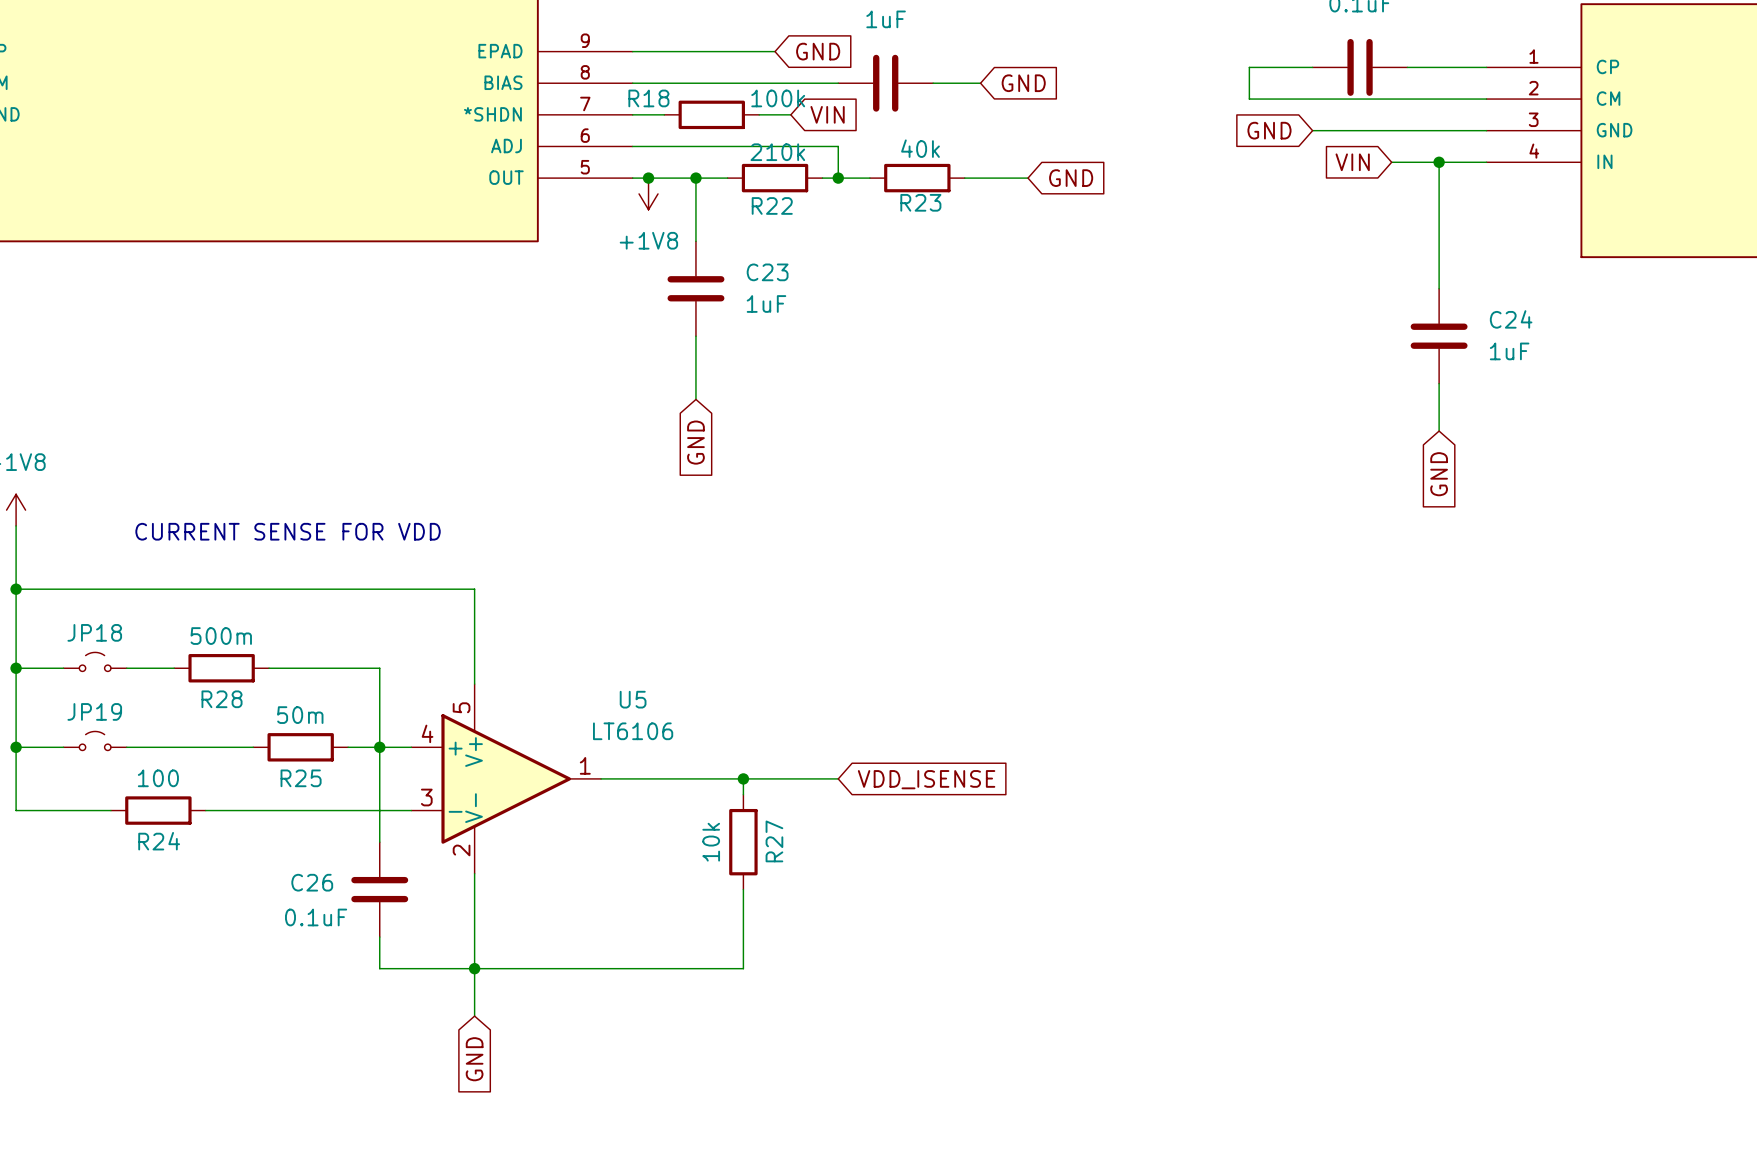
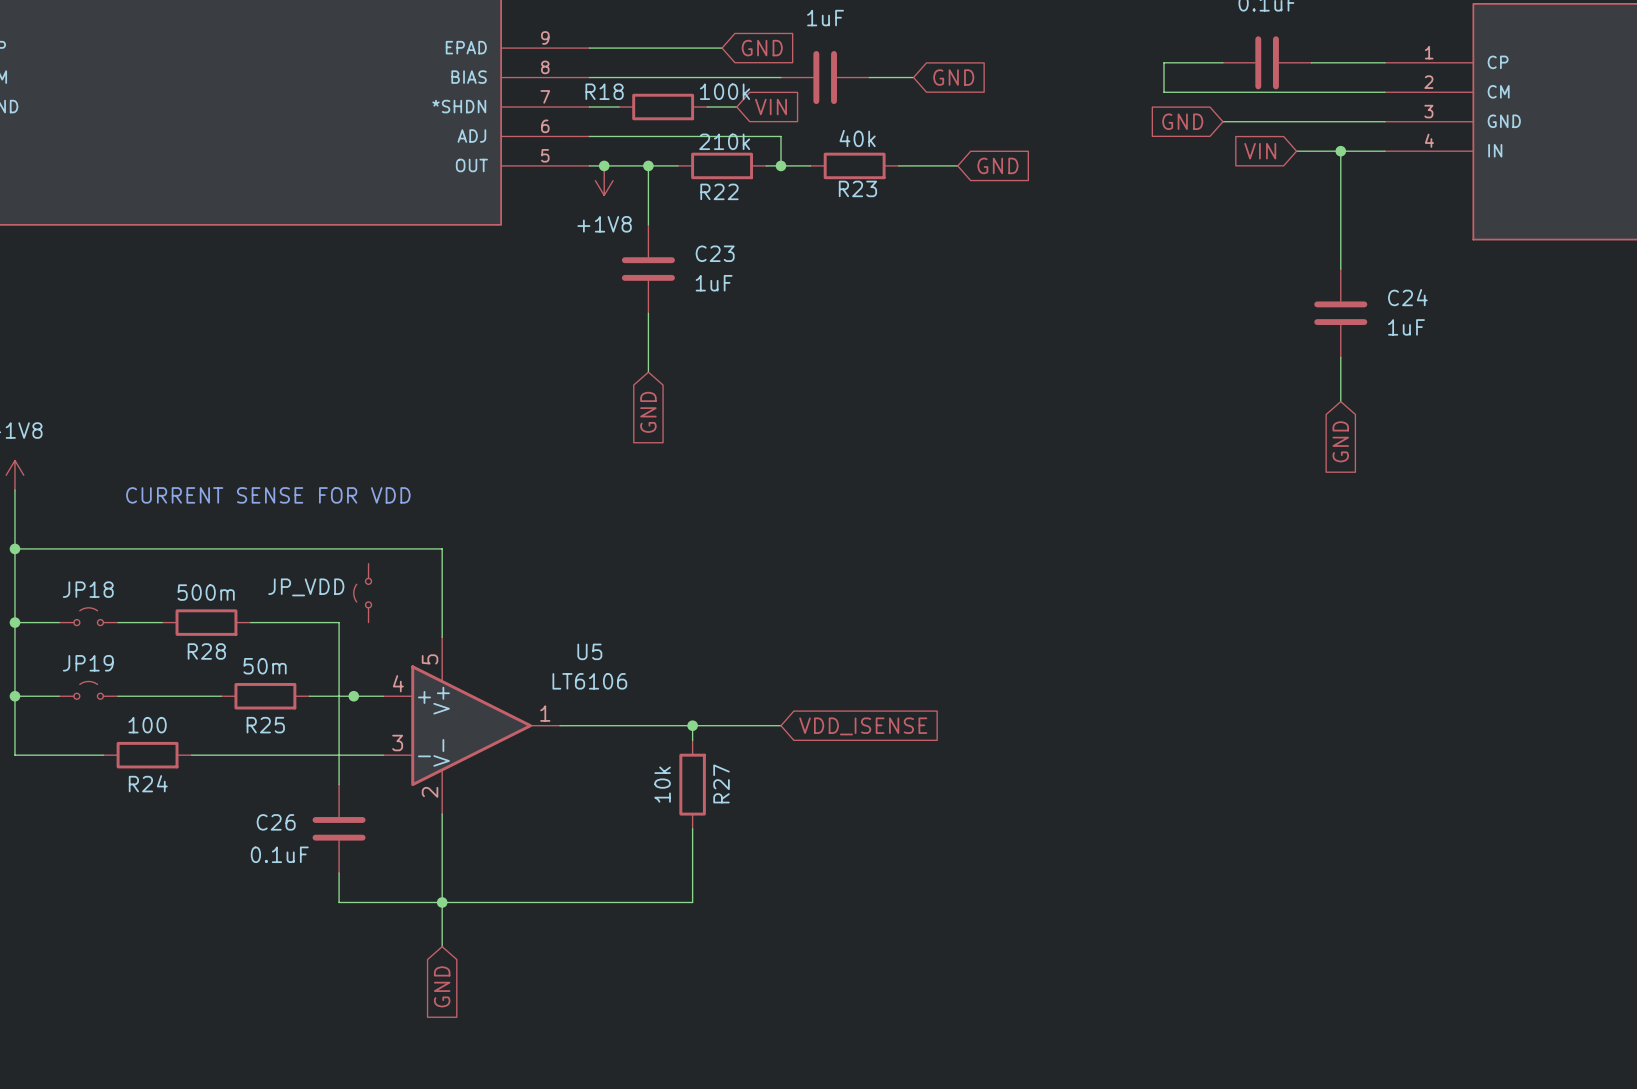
JP_VDD: none -> (362, 593)
wire: (363, 668) (379, 668) (379, 842) -> (339, 622) (339, 784)
R25 position: (300, 747) -> (265, 696)
C26 position: (379, 889) -> (339, 828)
wire: (379, 937) (379, 968) -> (339, 873) (339, 902) (353, 902)

